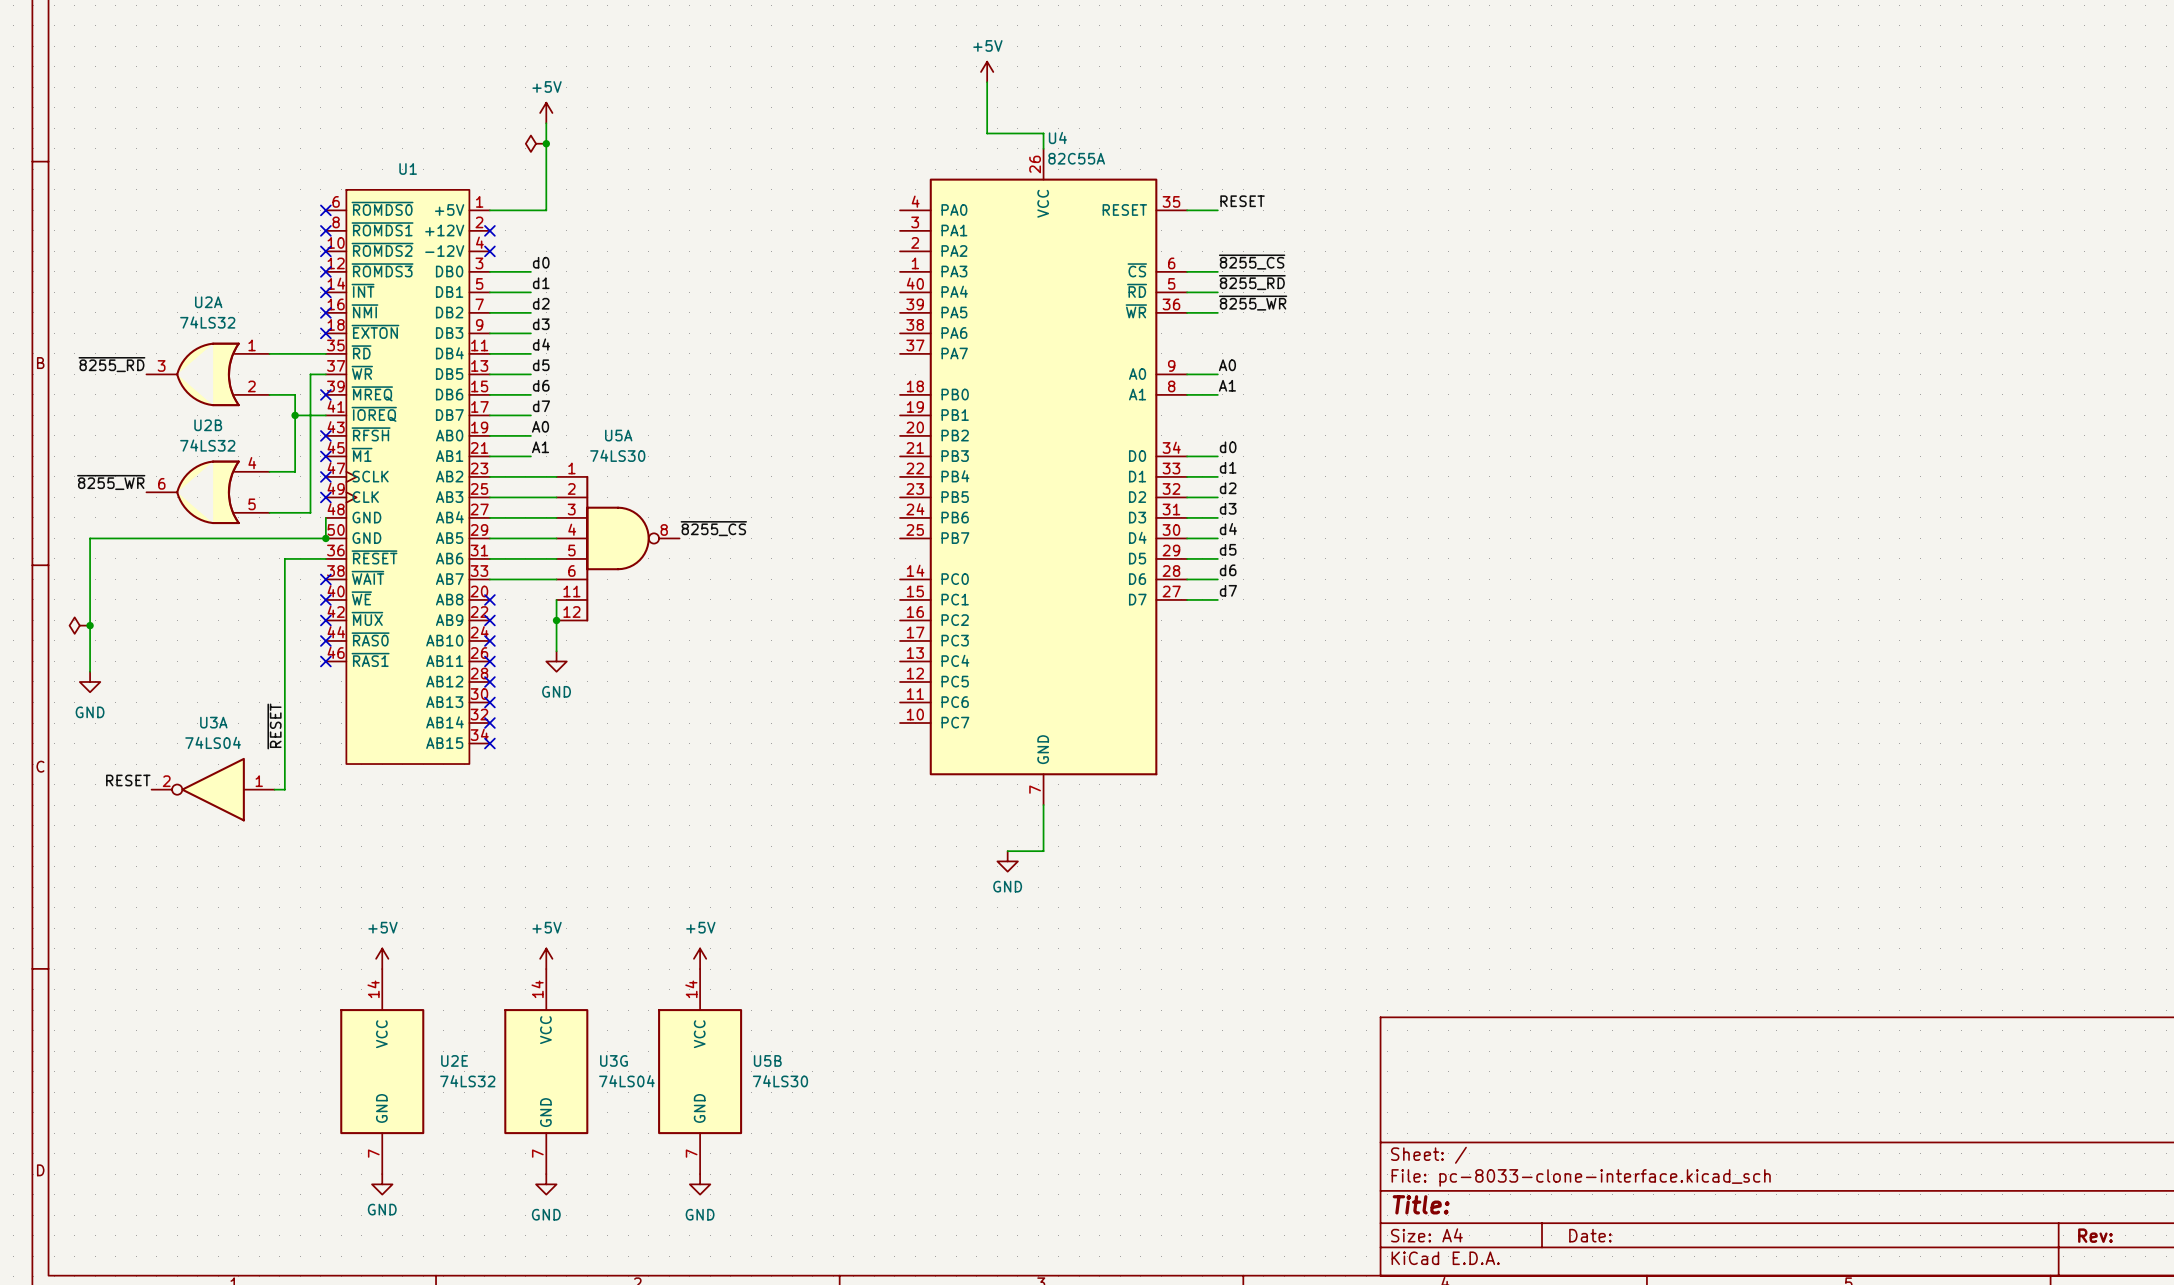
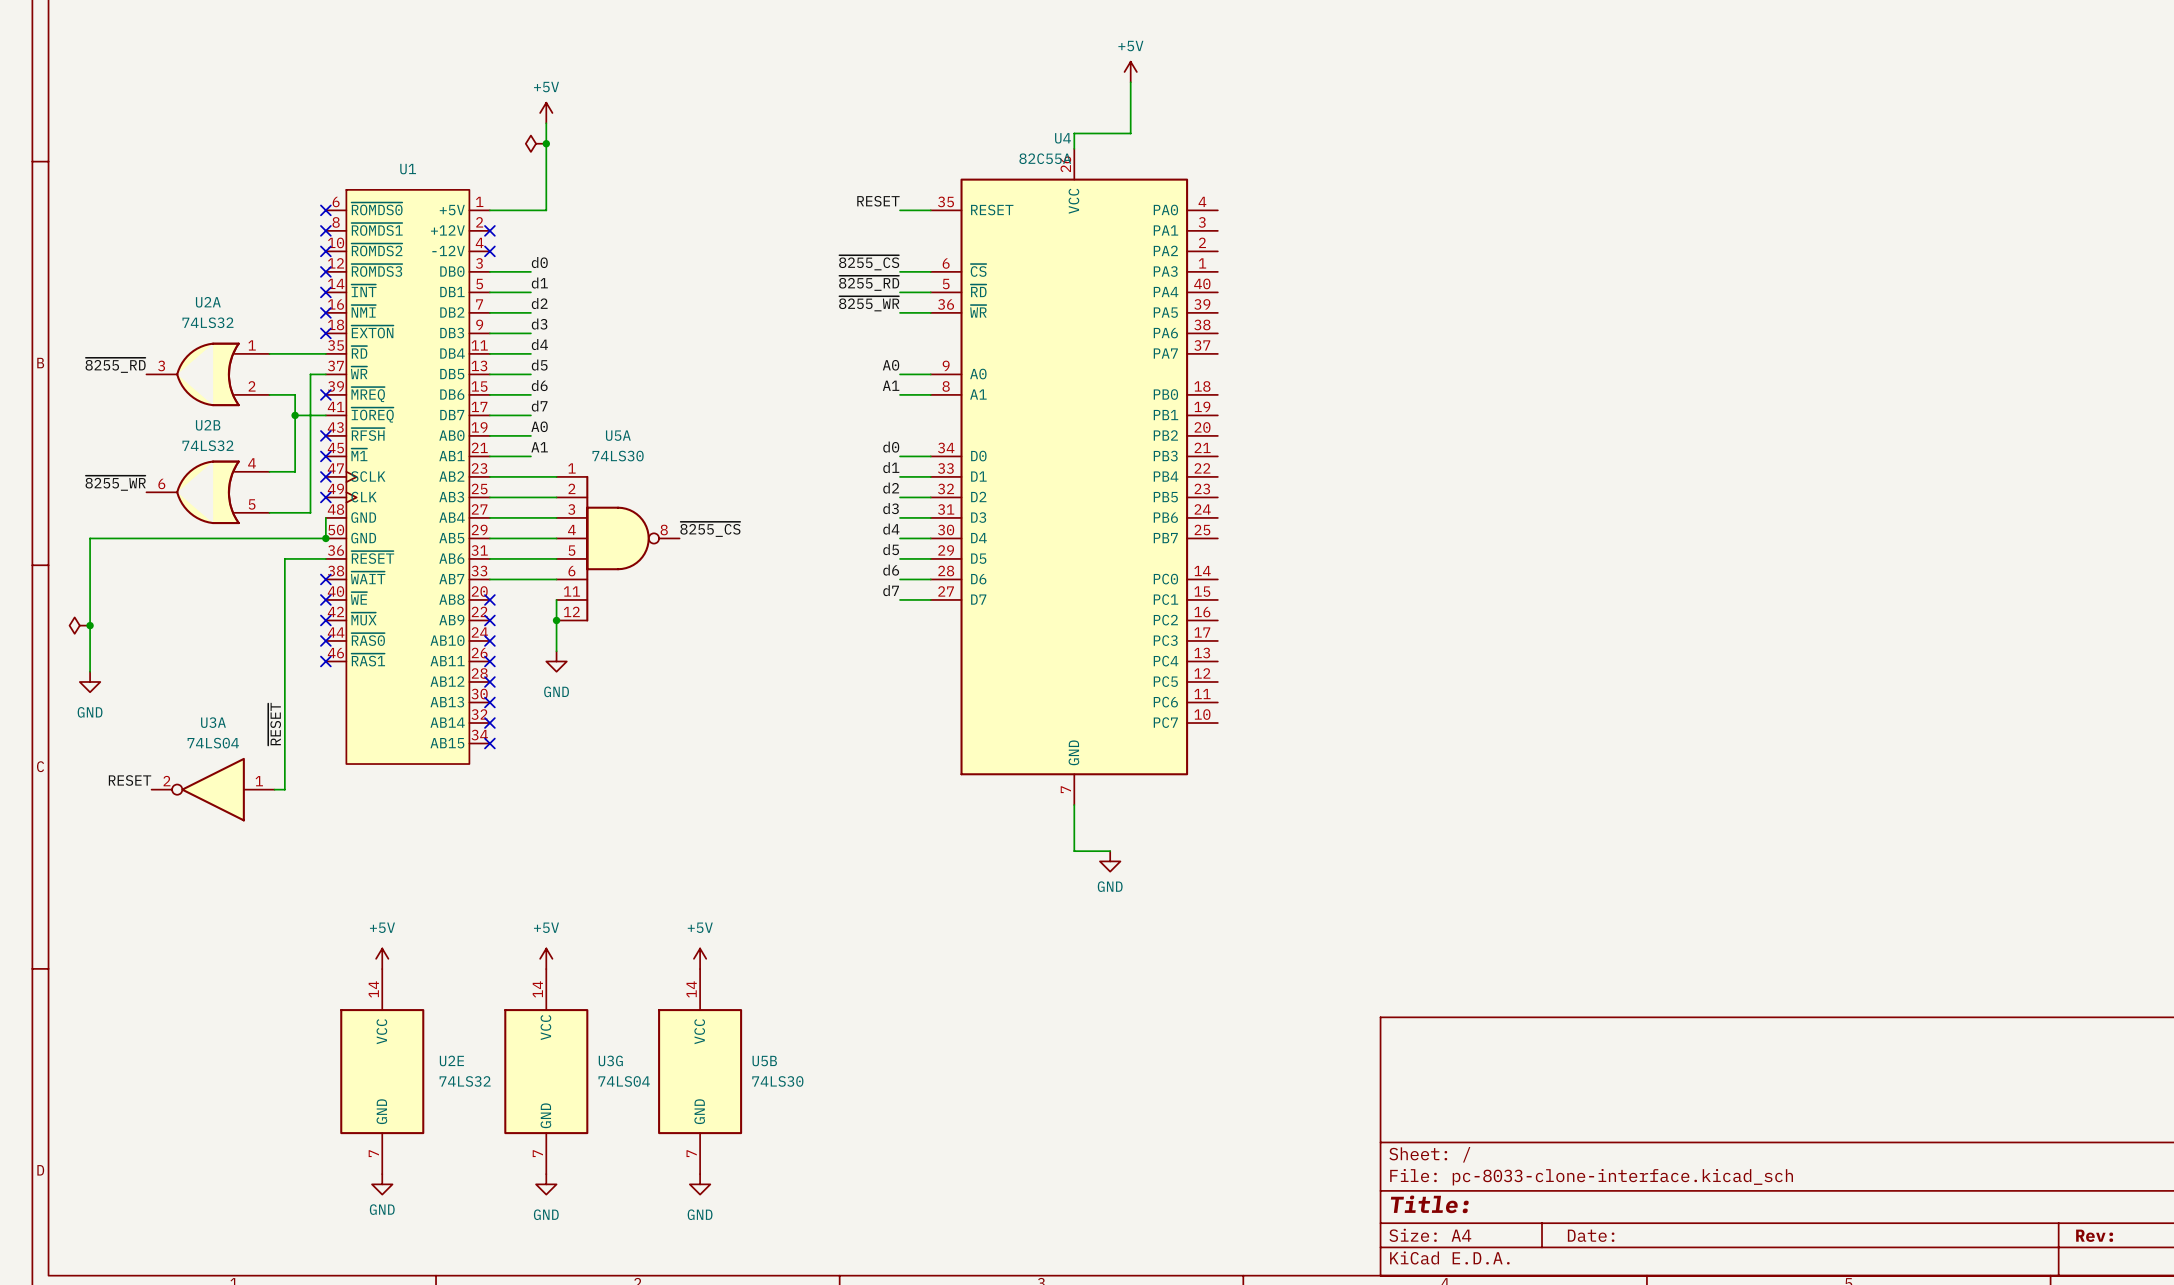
power symbol position: +5V (987, 71) -> +5V (1130, 71)
wire: (987, 82) (987, 133) (1043, 133) (1043, 148) -> none
wire: none -> (1130, 82) (1130, 133) (1074, 133) (1074, 148)
label: none -> RESET (878, 201)
label: RESET (1242, 201) -> none
label: none -> ~{8255_CS} (869, 262)
label: ~{8255_CS} (1252, 262) -> none
label: none -> ~{8255_RD} (869, 283)
label: ~{8255_RD} (1252, 282) -> none
label: none -> ~{8255_WR} (869, 303)
label: ~{8255_WR} (1253, 303) -> none
label: none -> A0 (891, 365)
label: A0 (1227, 365) -> none
wire: none -> (900, 374) (930, 374)
wire: (1187, 374) (1217, 374) -> none
label: none -> A1 (891, 385)
label: A1 (1227, 385) -> none
label: none -> d0 (891, 447)
label: d0 (1228, 447) -> none
label: none -> d1 (891, 467)
label: d1 (1228, 467) -> none
U4 flip: as is (1043, 476) -> left-right (1074, 476)
label: none -> d2 (891, 488)
label: d2 (1228, 488) -> none
label: none -> d3 (891, 508)
label: d3 (1228, 508) -> none
label: none -> d4 (891, 529)
label: d4 (1228, 529) -> none
label: none -> d5 (891, 549)
label: d5 (1228, 549) -> none
wire: none -> (900, 558) (930, 558)
wire: (1187, 558) (1217, 558) -> none
label: none -> d6 (891, 570)
label: d6 (1228, 570) -> none
label: none -> d7 (891, 590)
label: d7 (1228, 590) -> none
wire: (1043, 805) (1043, 851) (1007, 851) -> none
wire: none -> (1074, 805) (1074, 851) (1110, 851)
power symbol position: GND (1007, 861) -> GND (1110, 861)

